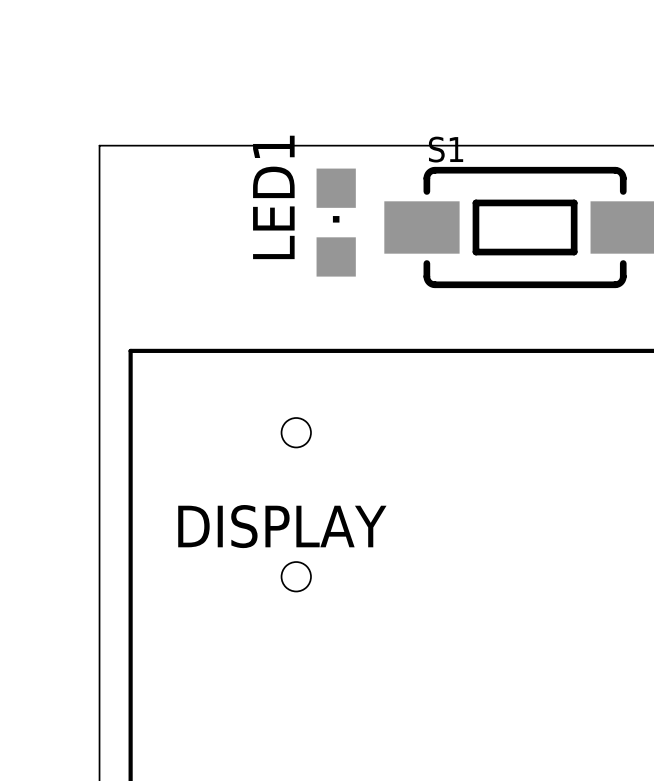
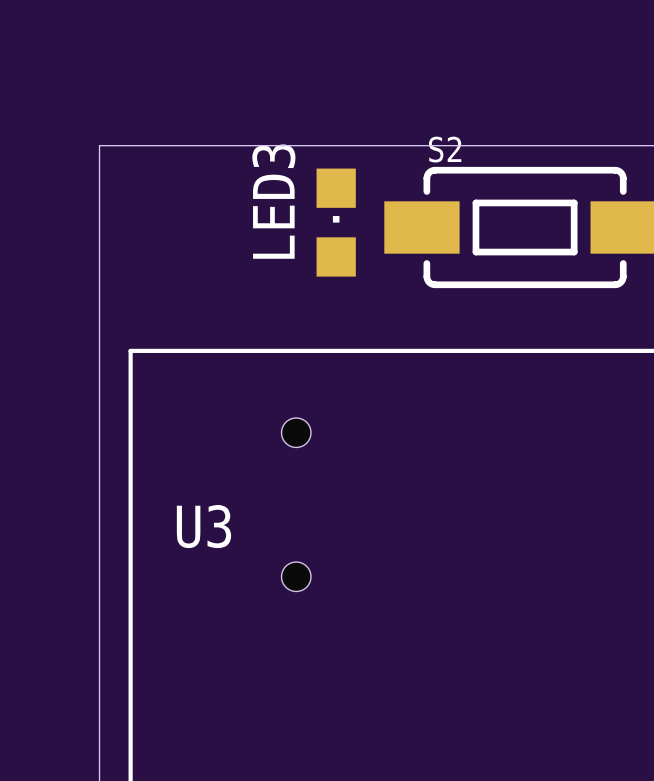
S1 name: S1 (446, 149) -> S2 (445, 149)
LED1 name: LED1 (273, 197) -> LED3 (273, 201)
DISPLAY name: DISPLAY (282, 526) -> U3 (203, 526)

